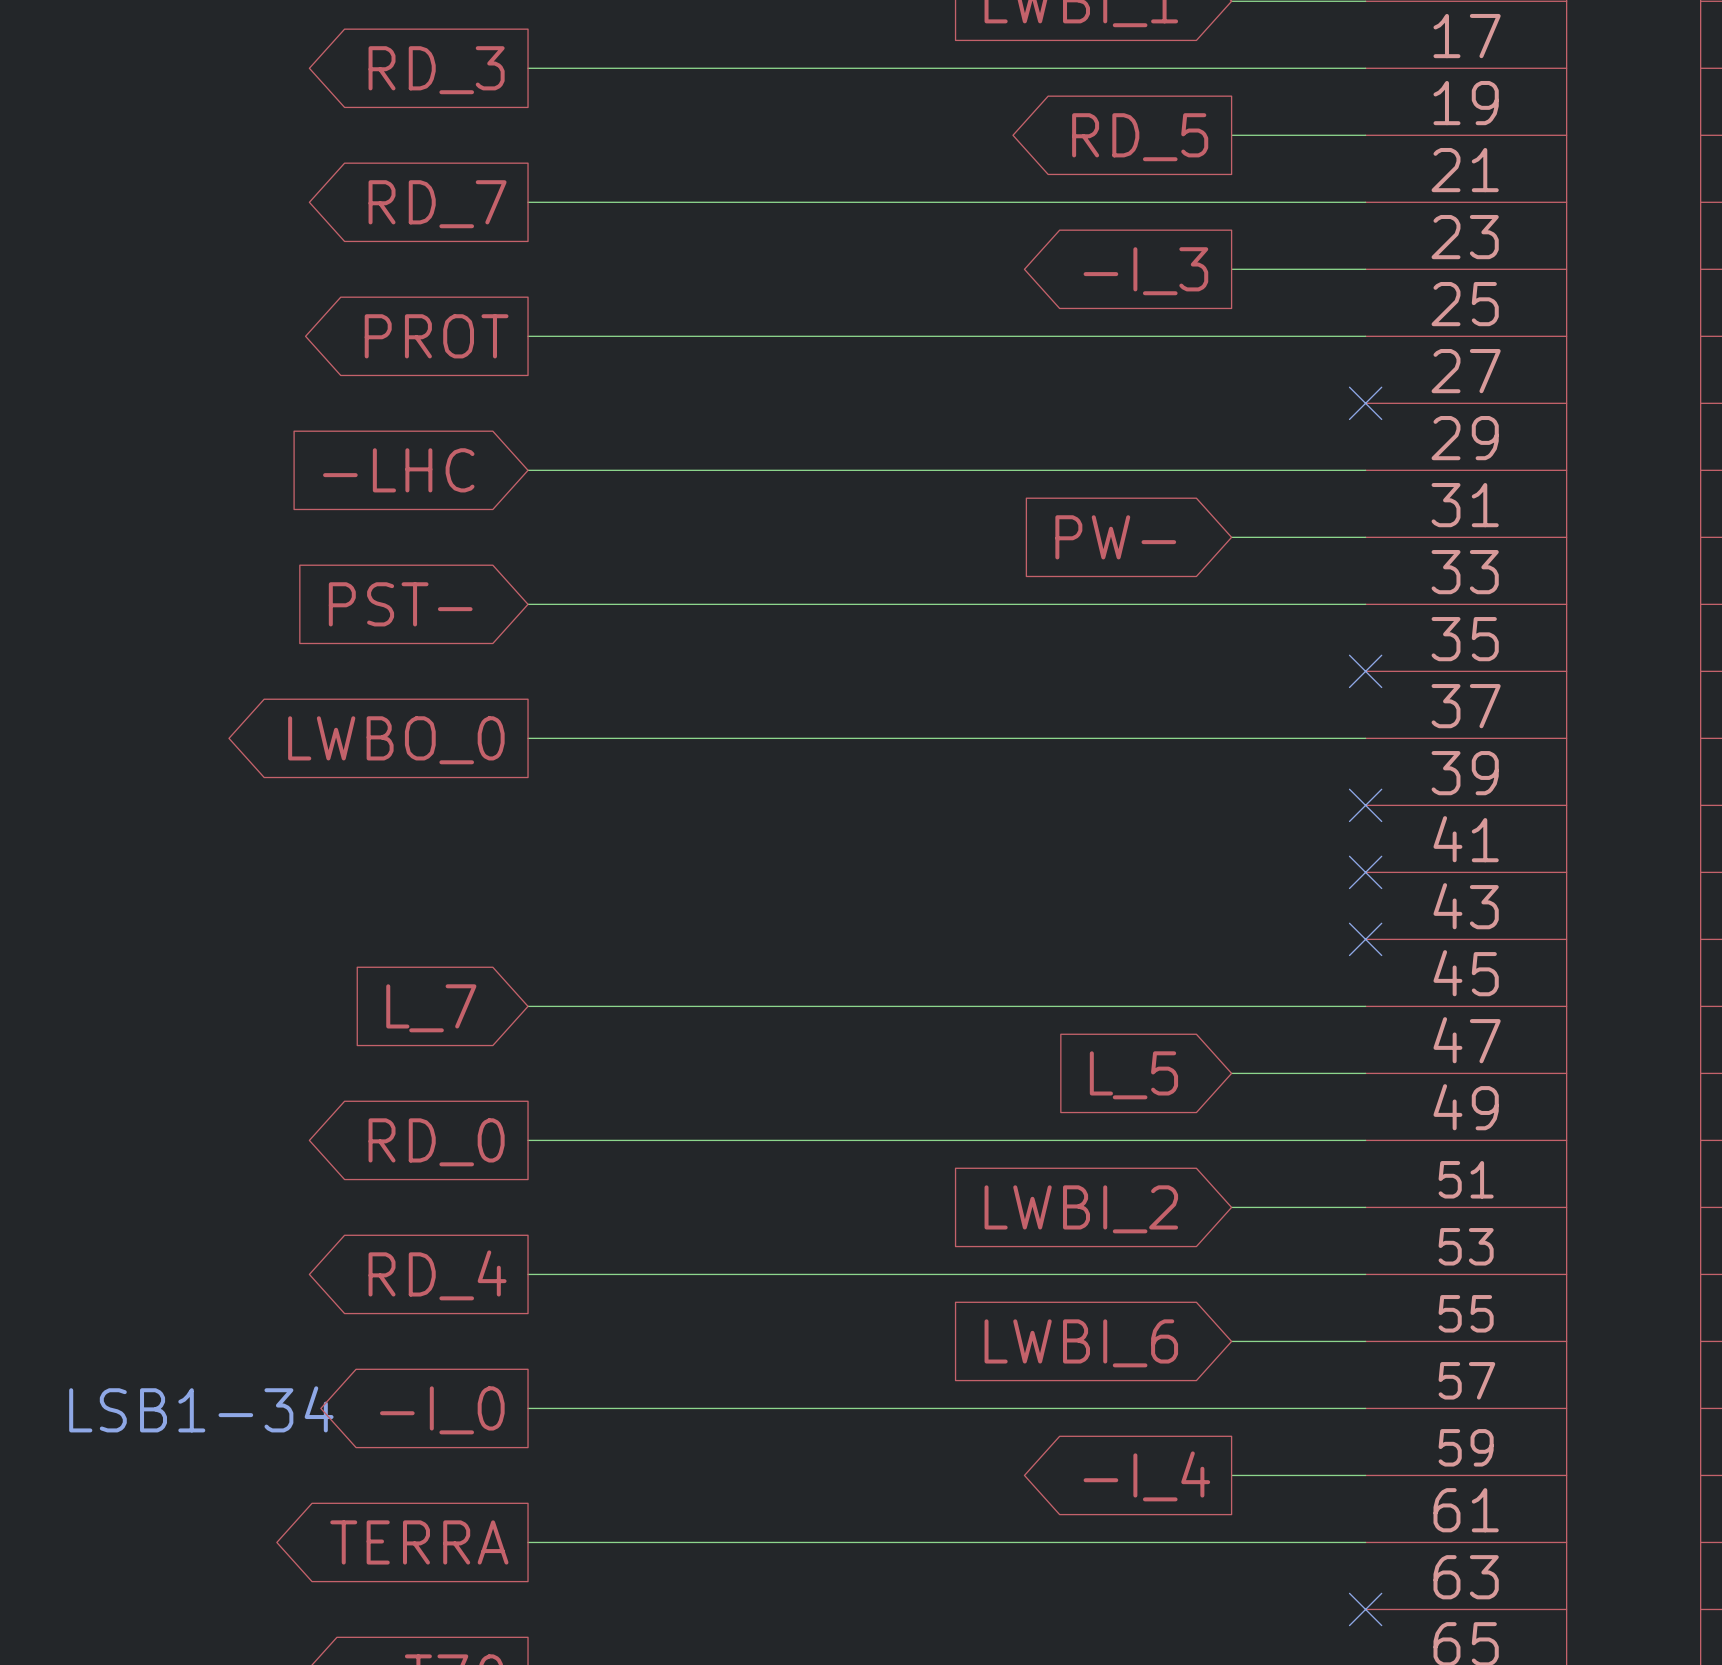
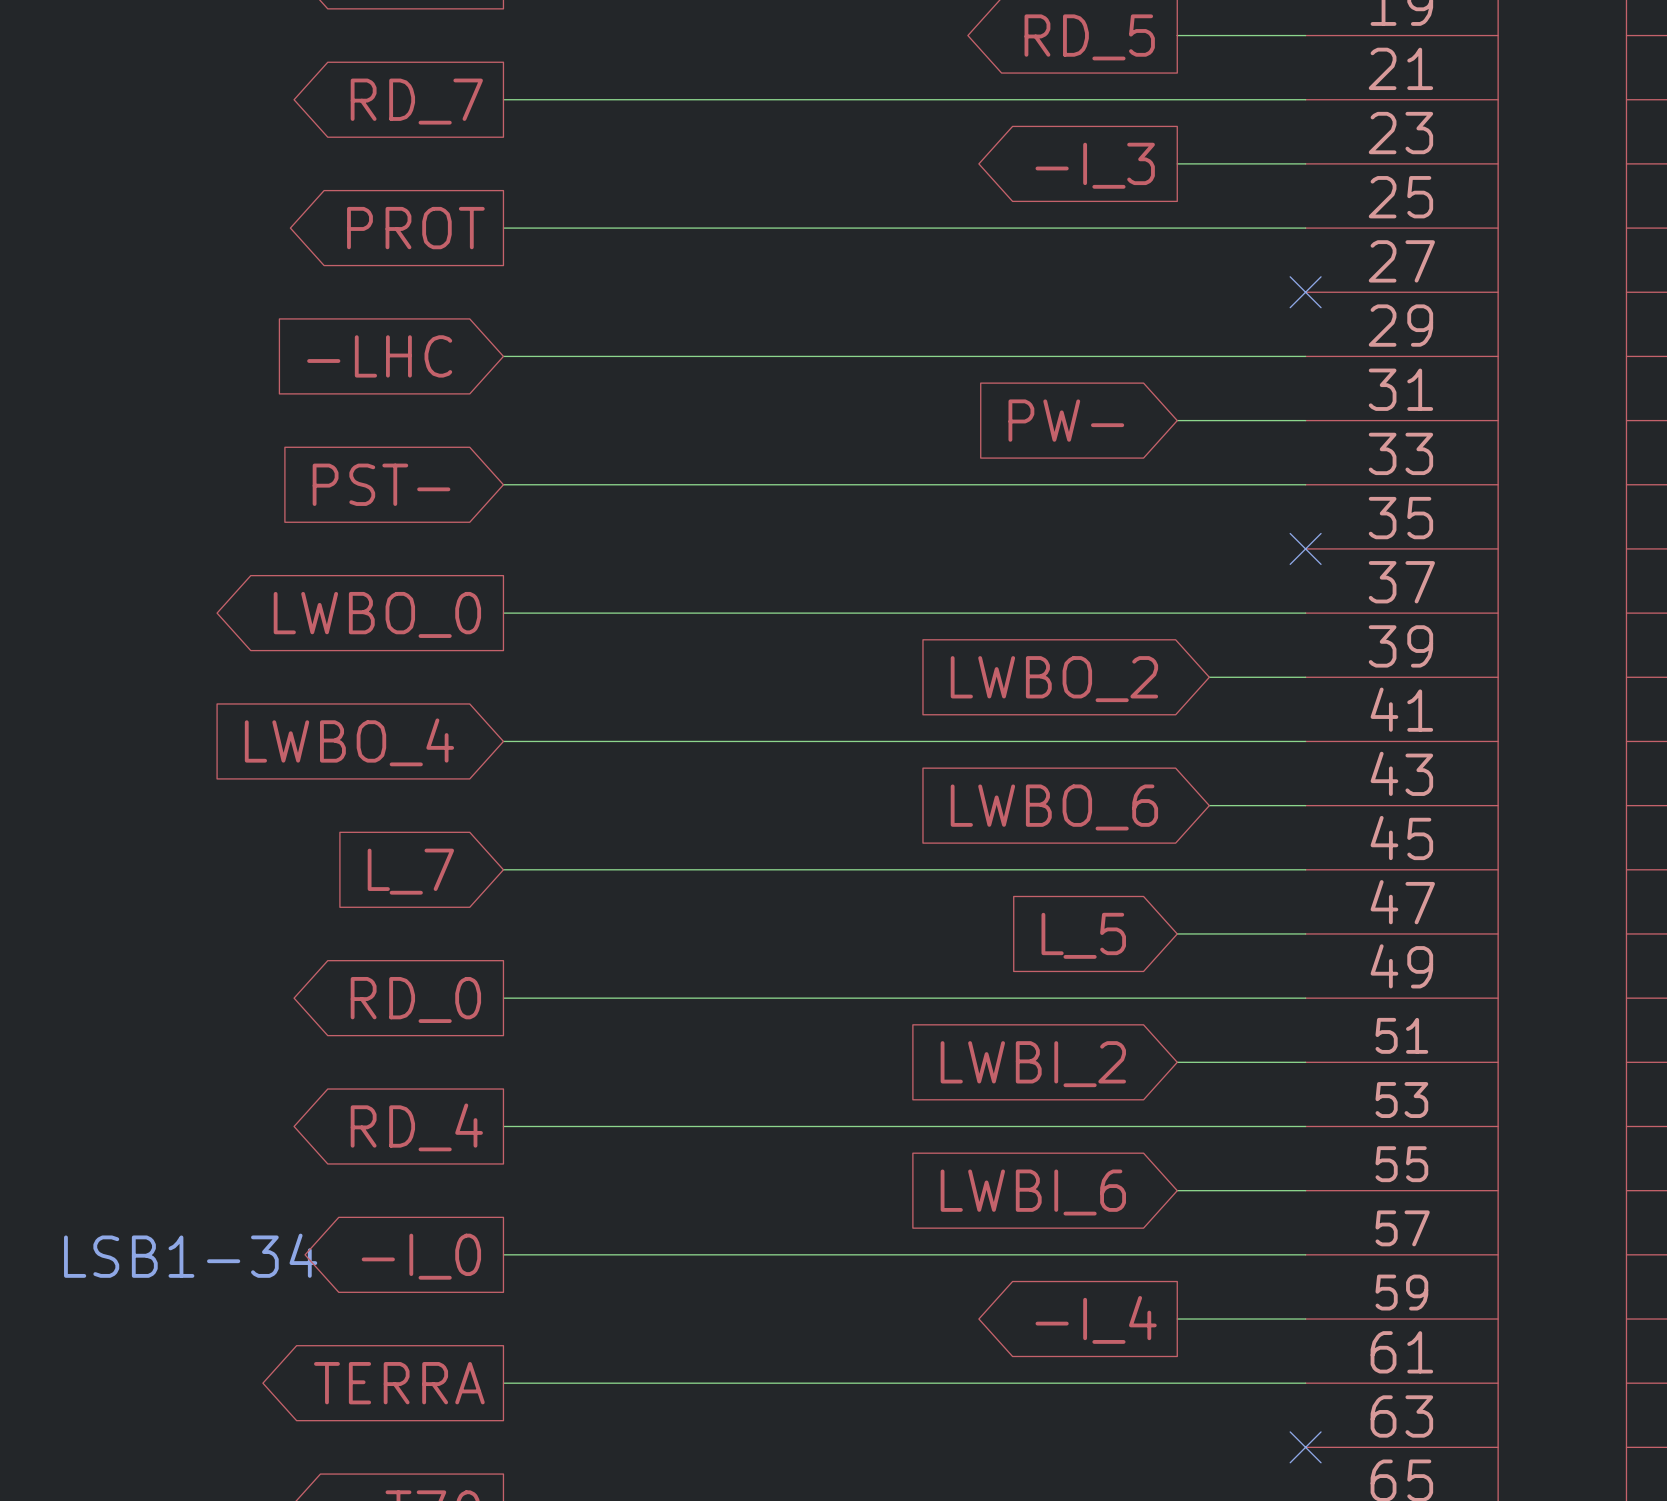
wire: none -> (1209, 677) (1305, 677)
no-connect mark: (1365, 805) -> none
global label: none -> LWBO_2 (1054, 679)
wire: none -> (503, 741) (1305, 741)
no-connect mark: (1365, 872) -> none
global label: none -> LWBO_4 (349, 742)
wire: none -> (1209, 805) (1305, 805)
no-connect mark: (1365, 939) -> none
global label: none -> LWBO_6 (1054, 807)

